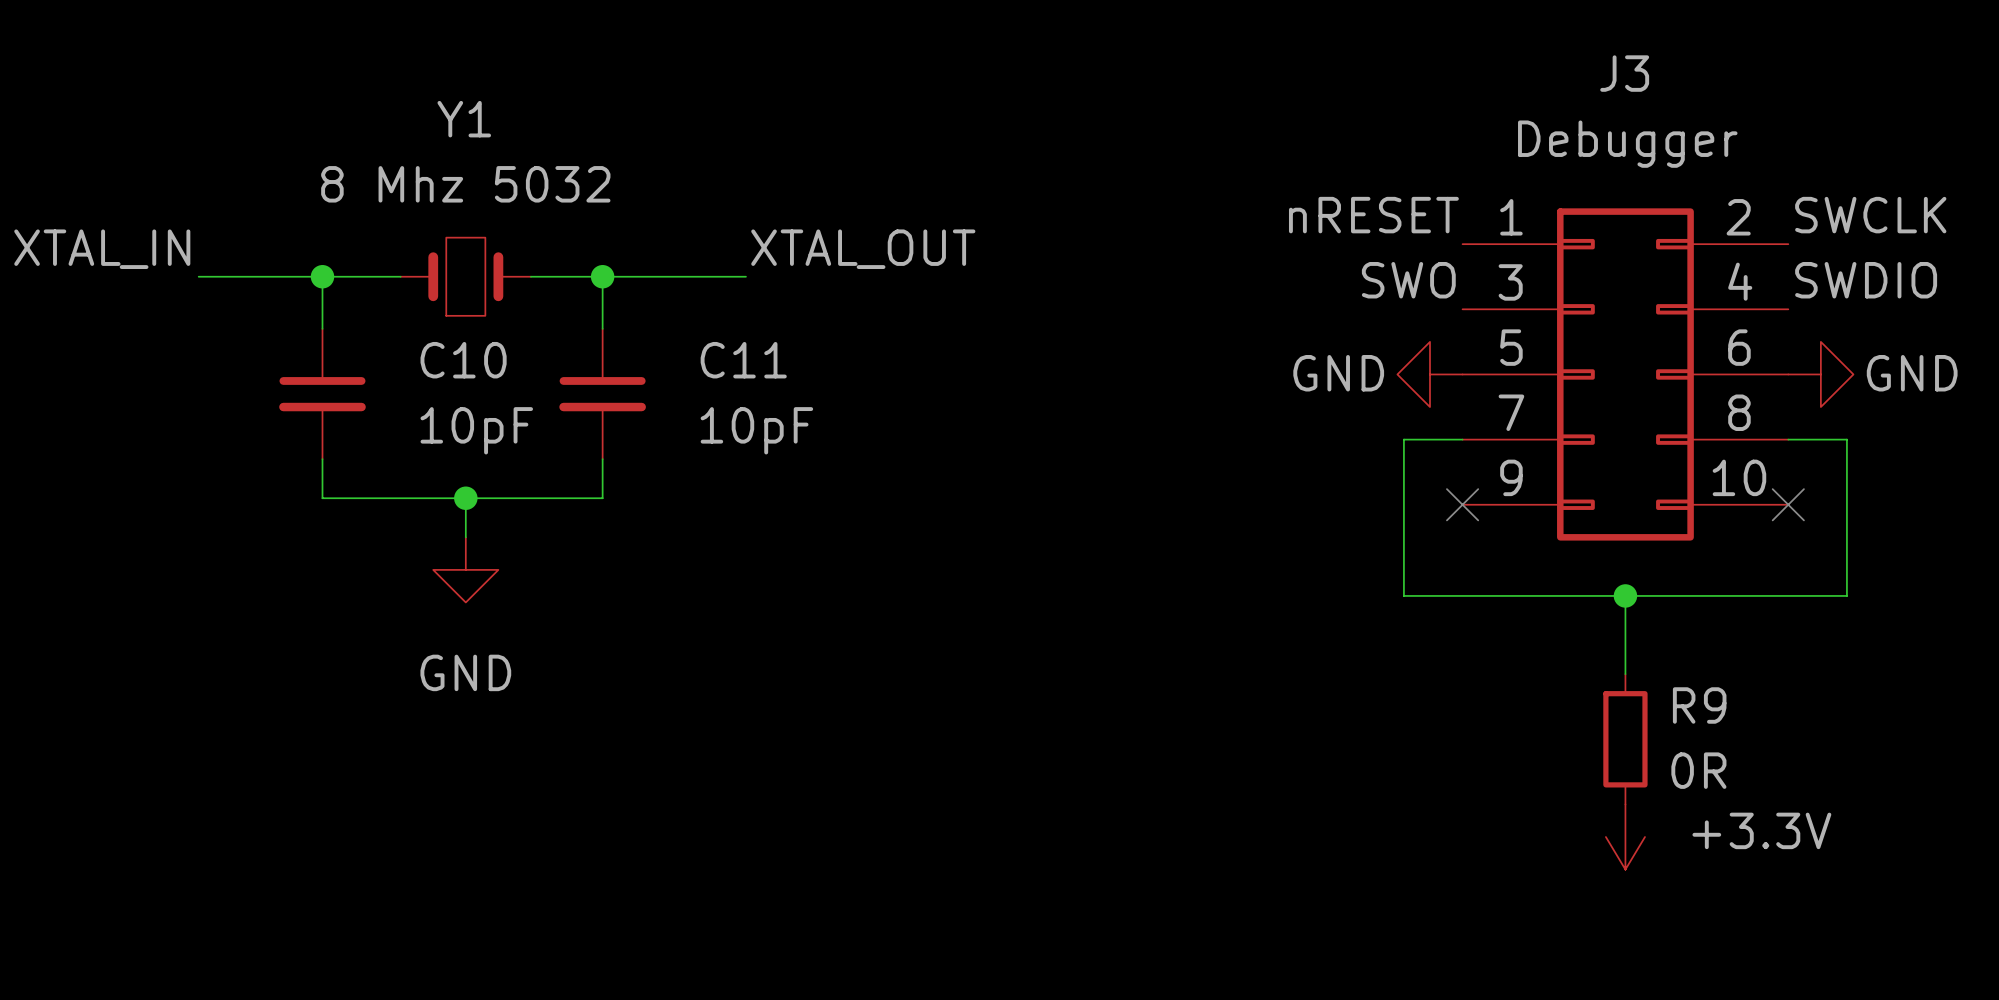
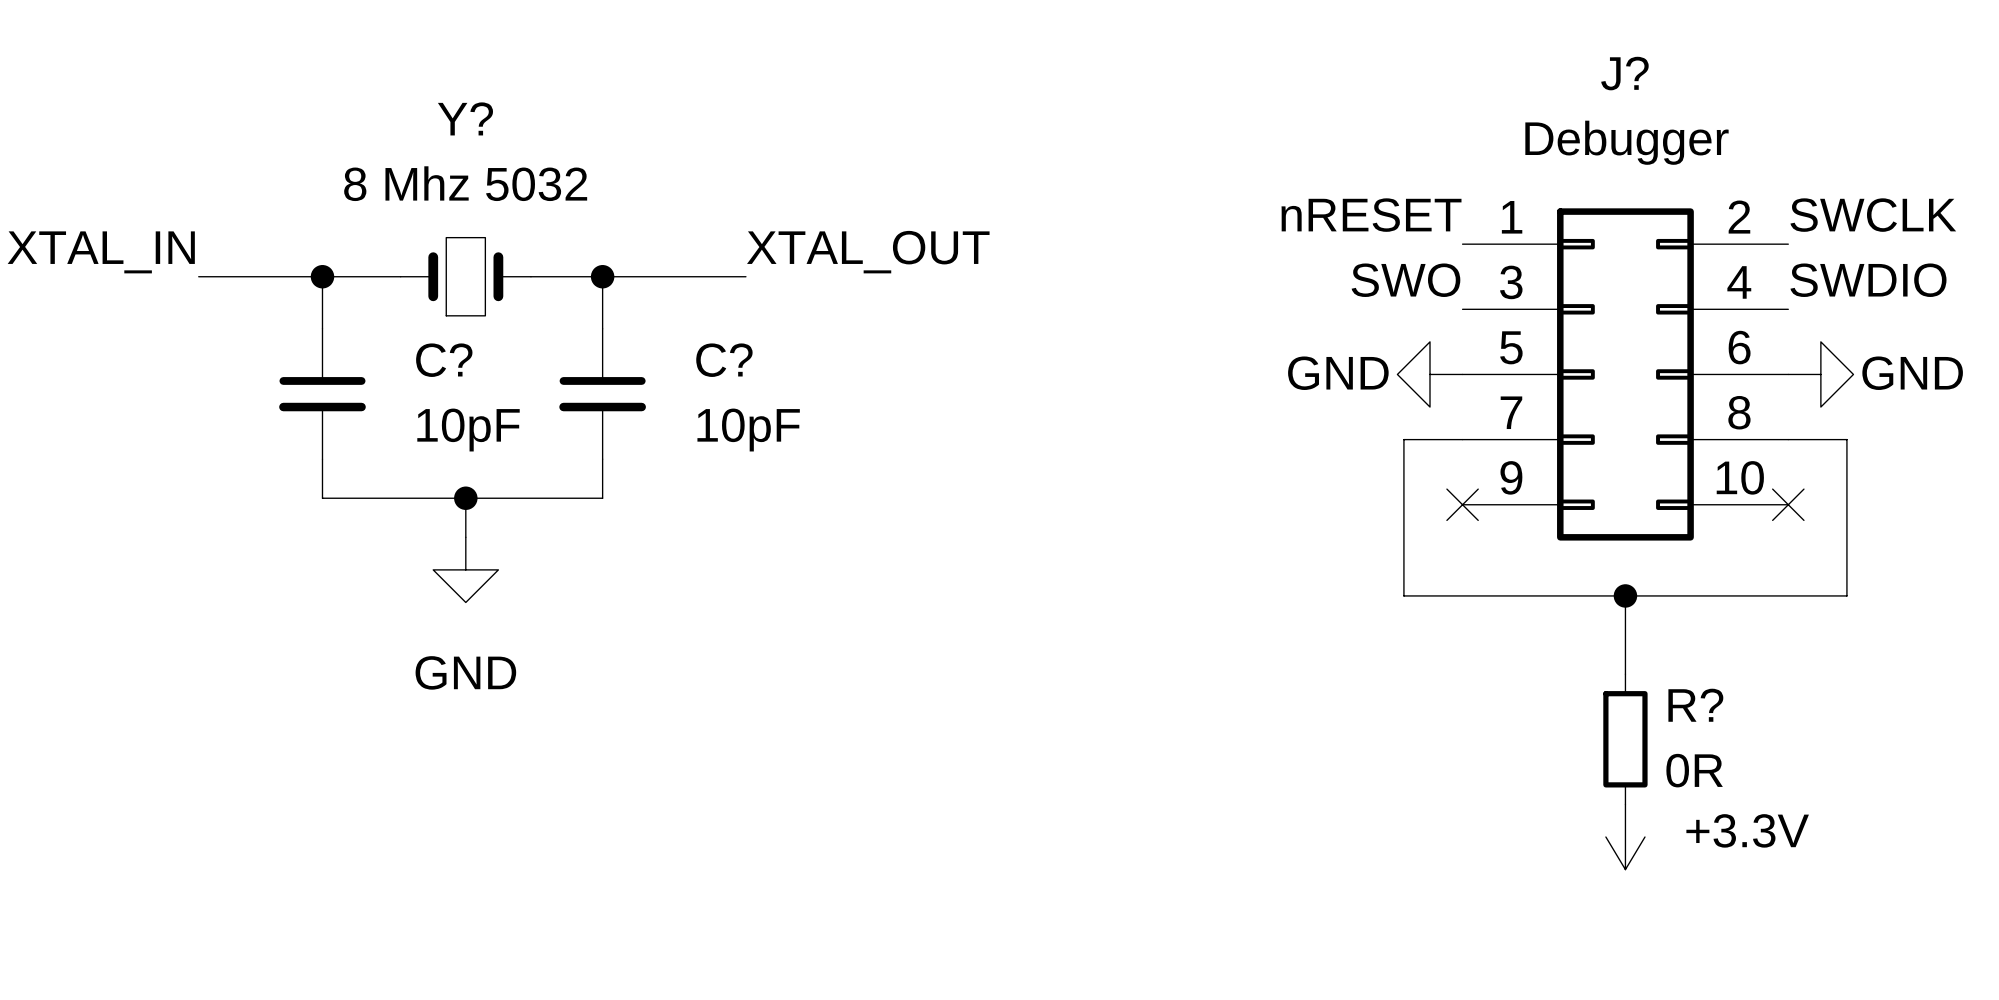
J3 name: J3 (1624, 73) -> J? (1624, 73)
Y1 name: Y1 (464, 119) -> Y? (465, 118)
C10 name: C10 (463, 360) -> C? (444, 360)
C11 name: C11 (743, 360) -> C? (724, 360)
R9 name: R9 (1699, 705) -> R? (1695, 705)

